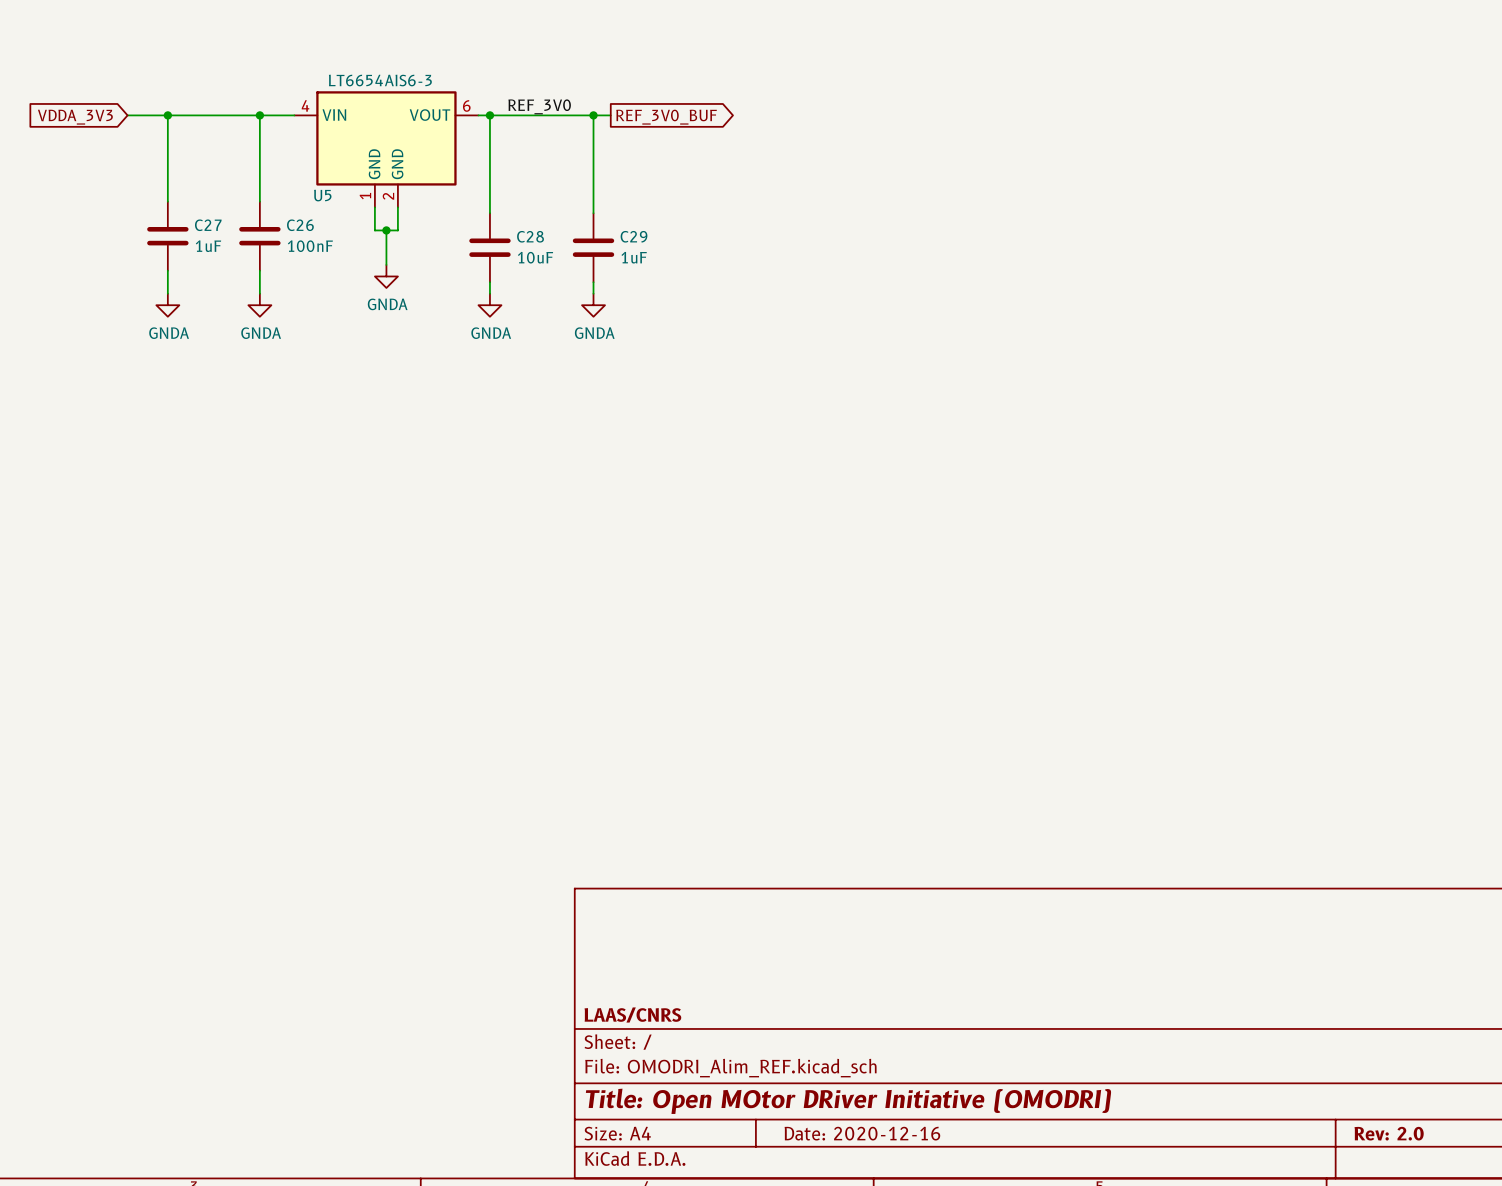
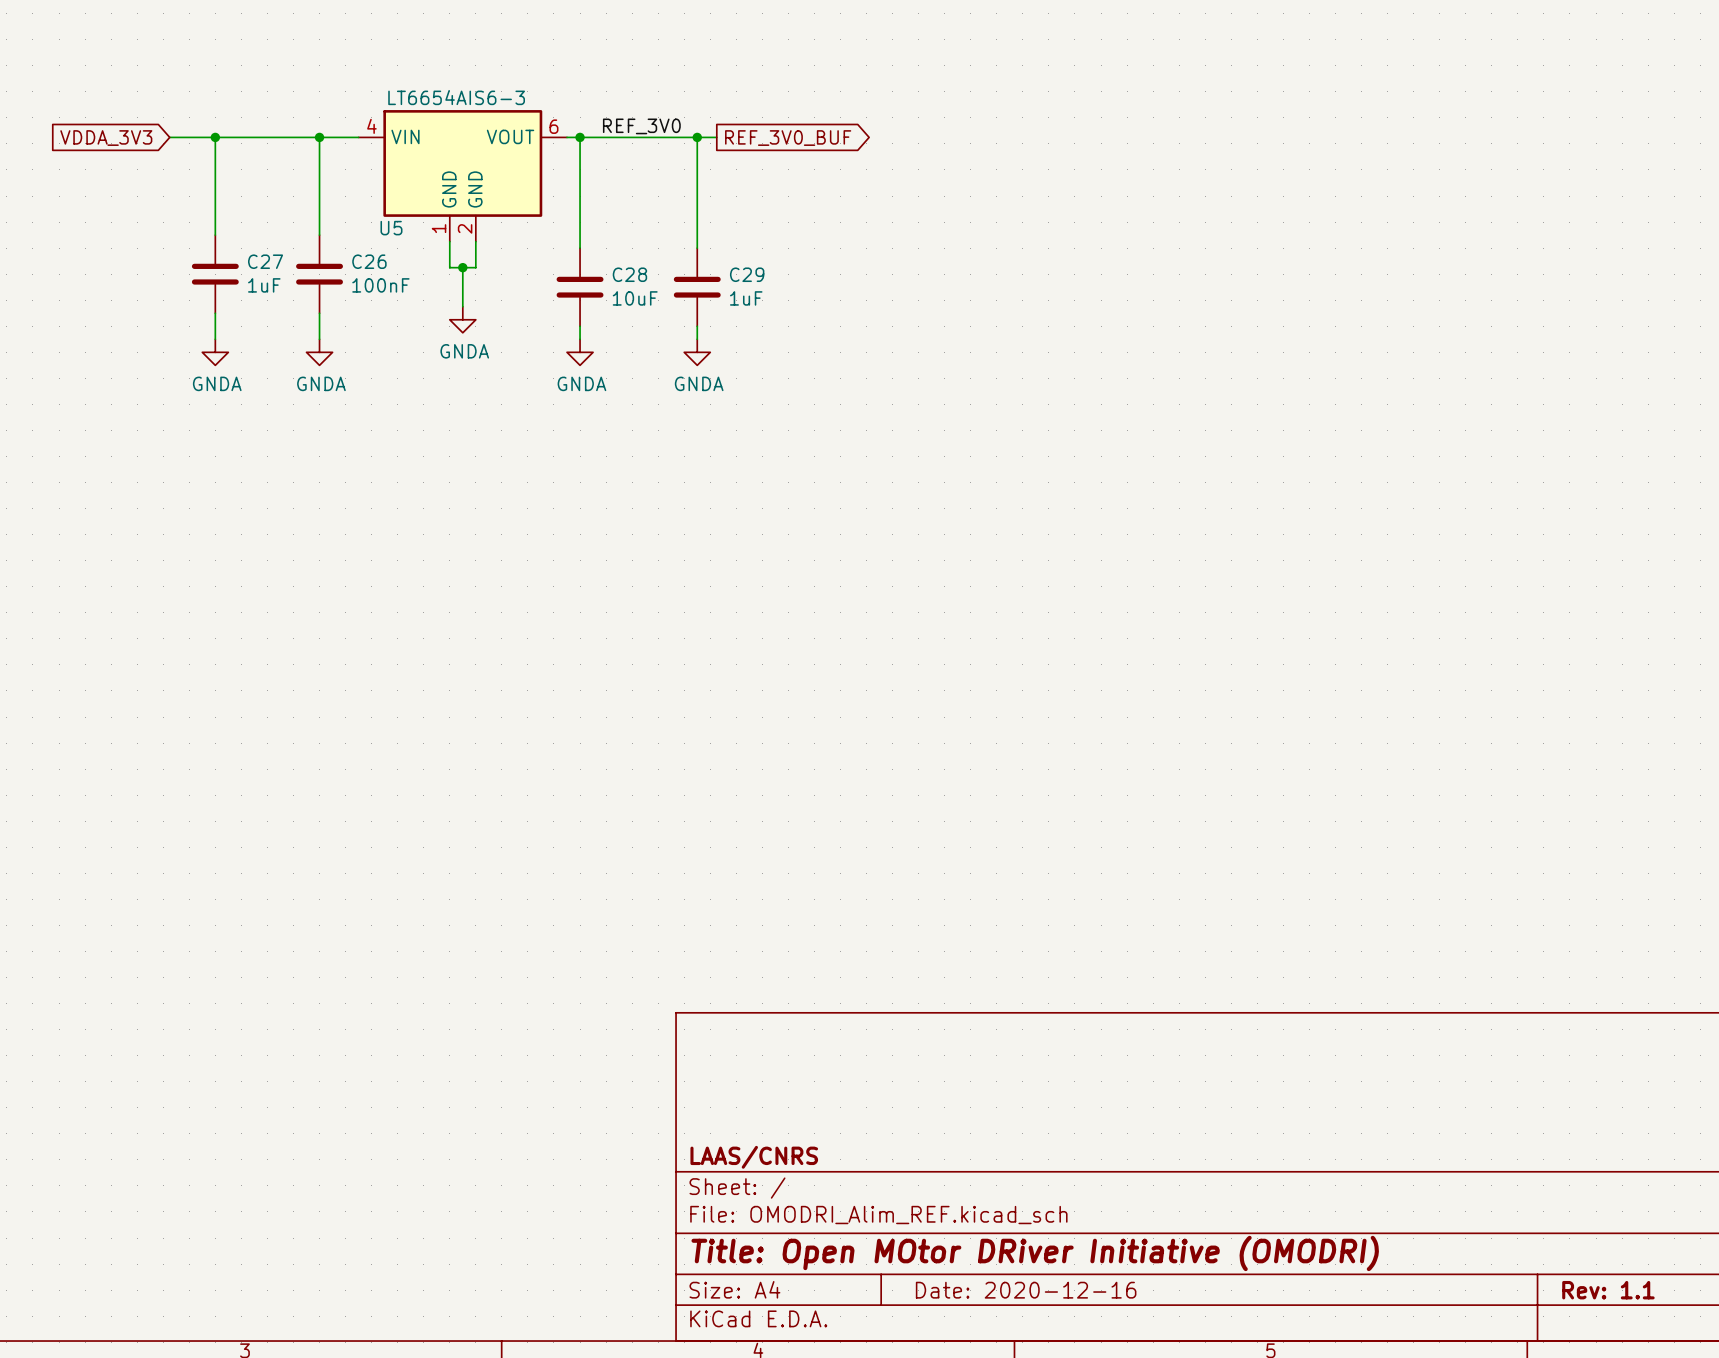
title block: Rev: 2.0 (1389, 1133) -> Rev: 1.1 (1608, 1290)

